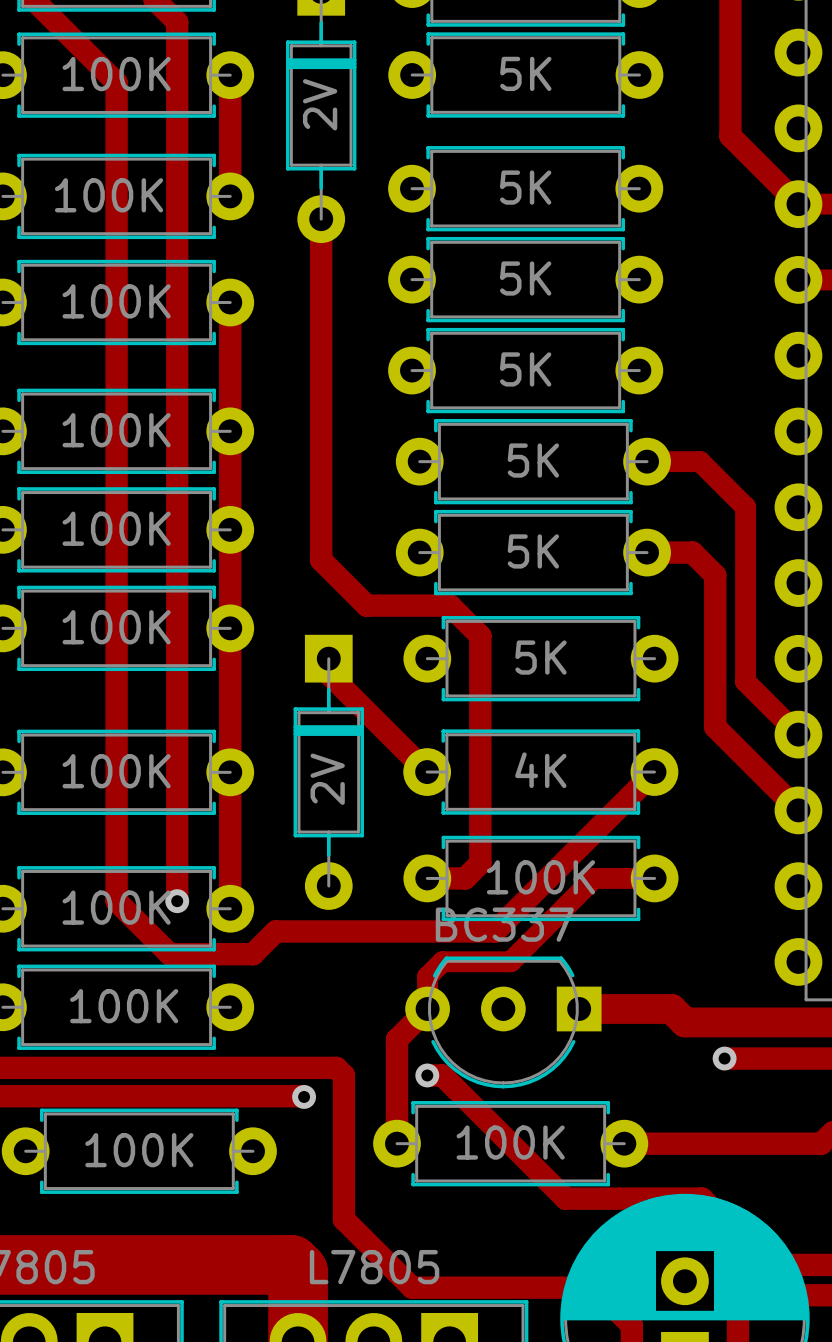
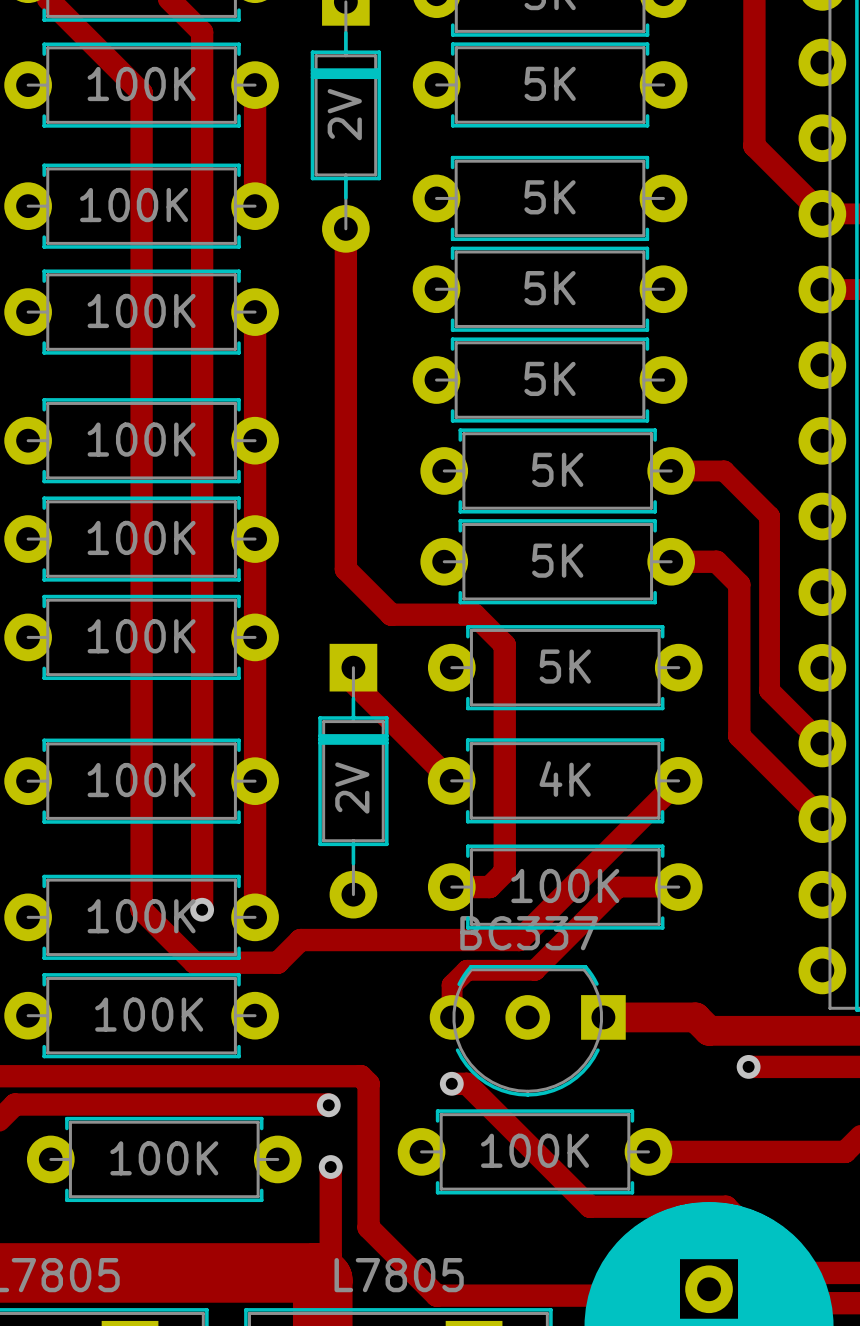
track: (427, 1008) (396, 1039) (396, 1143) -> none
track: none -> (330, 1167) (330, 1257) (315, 1272)
via: none -> (330, 1167)

